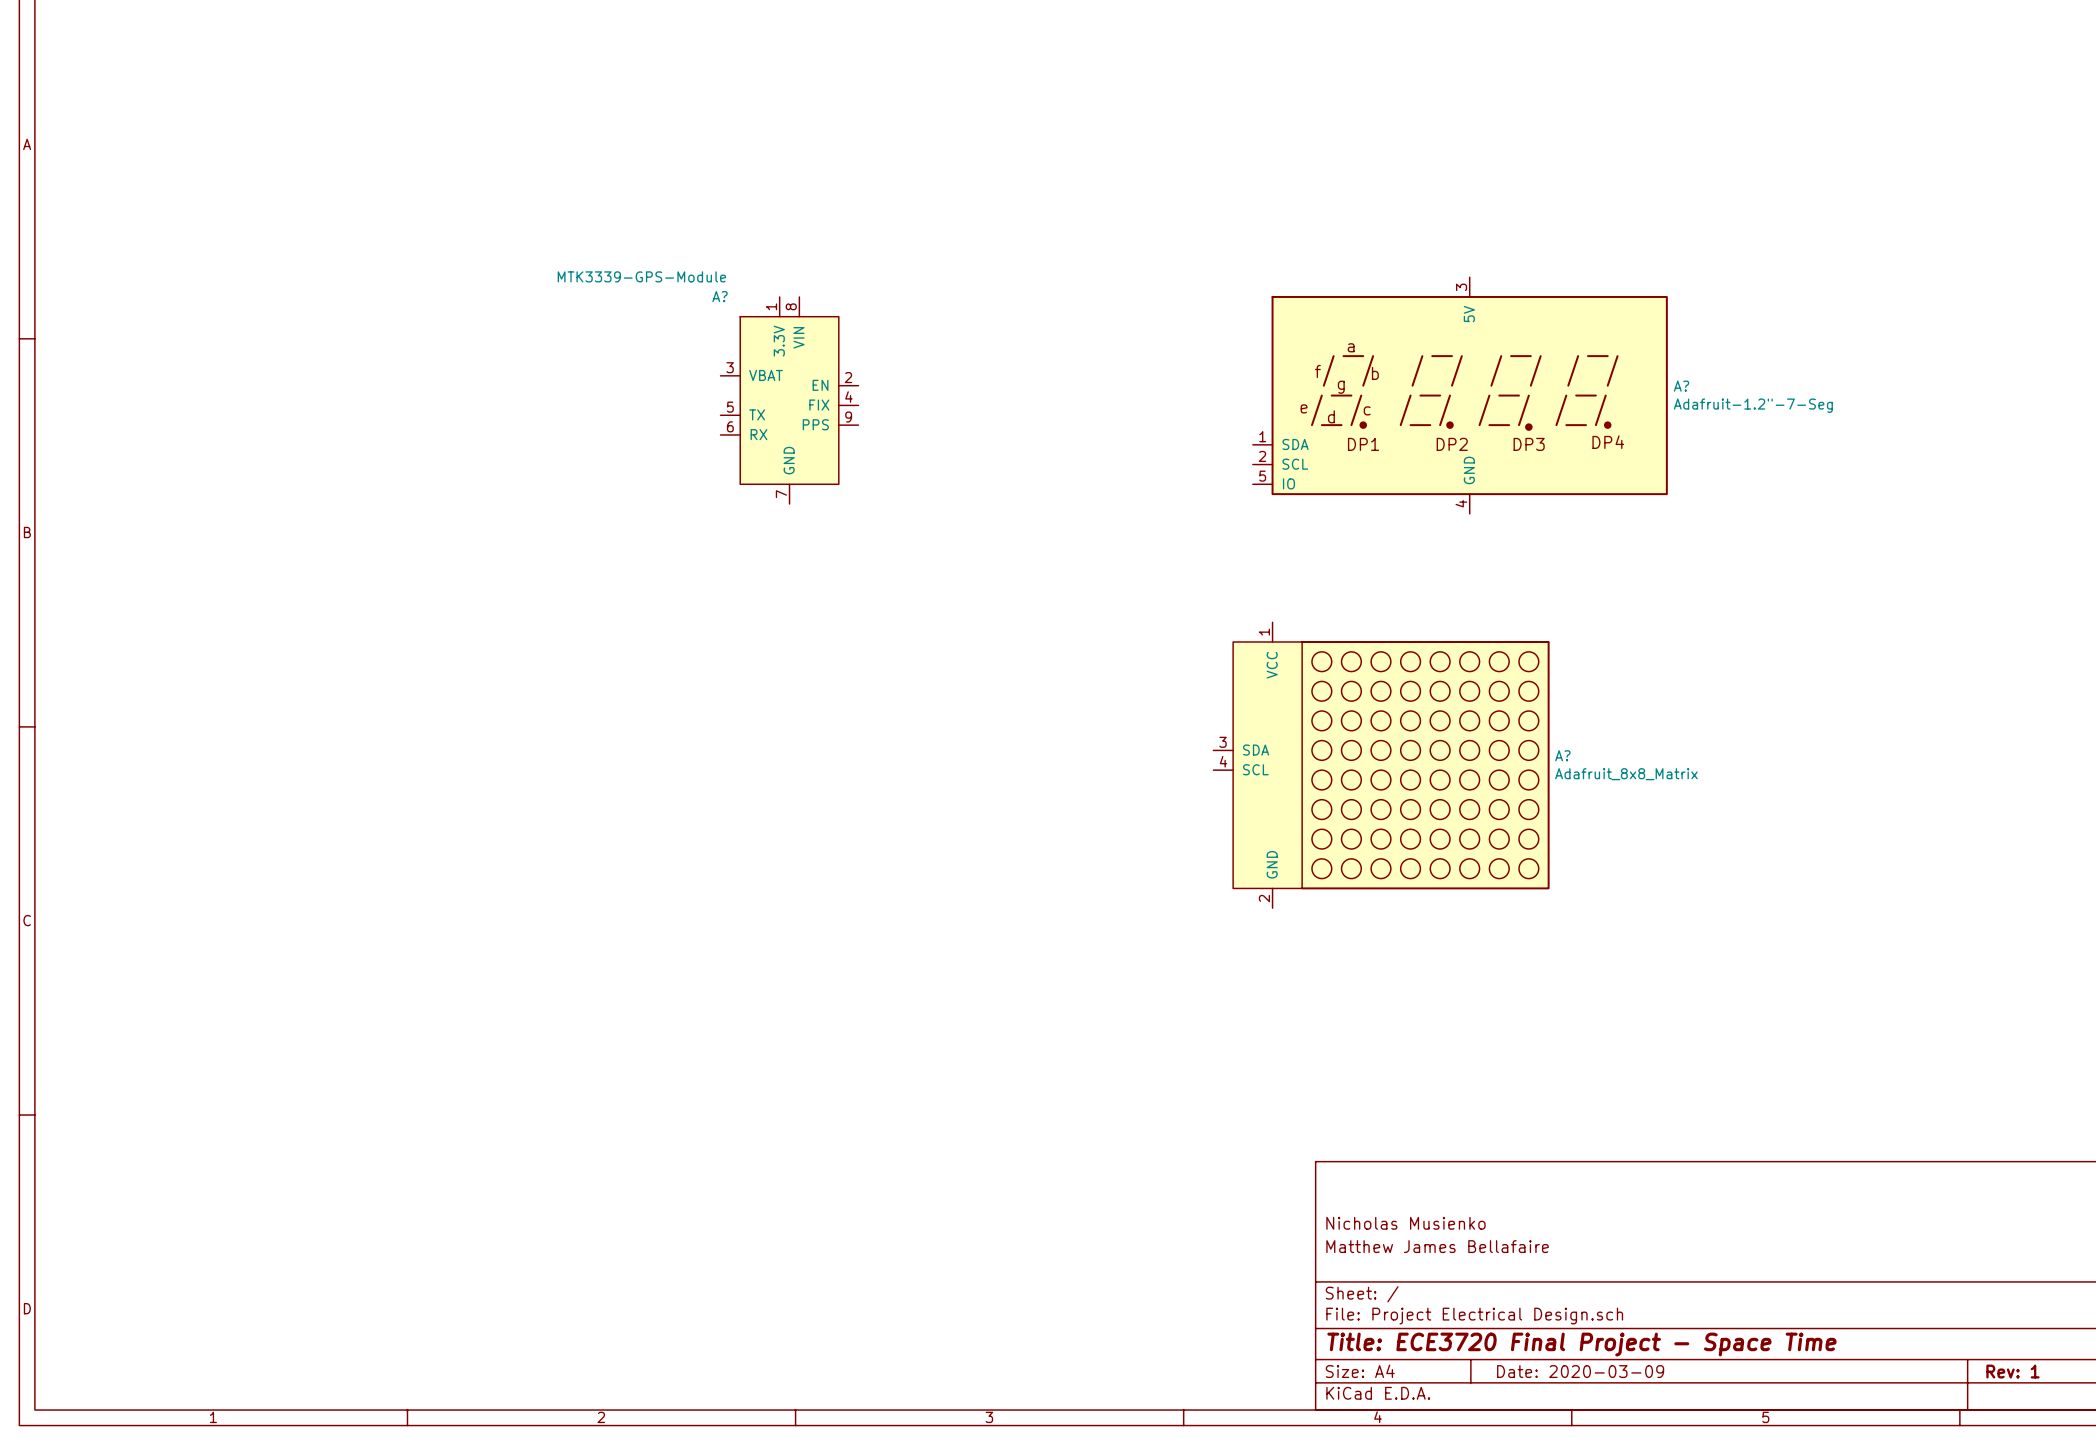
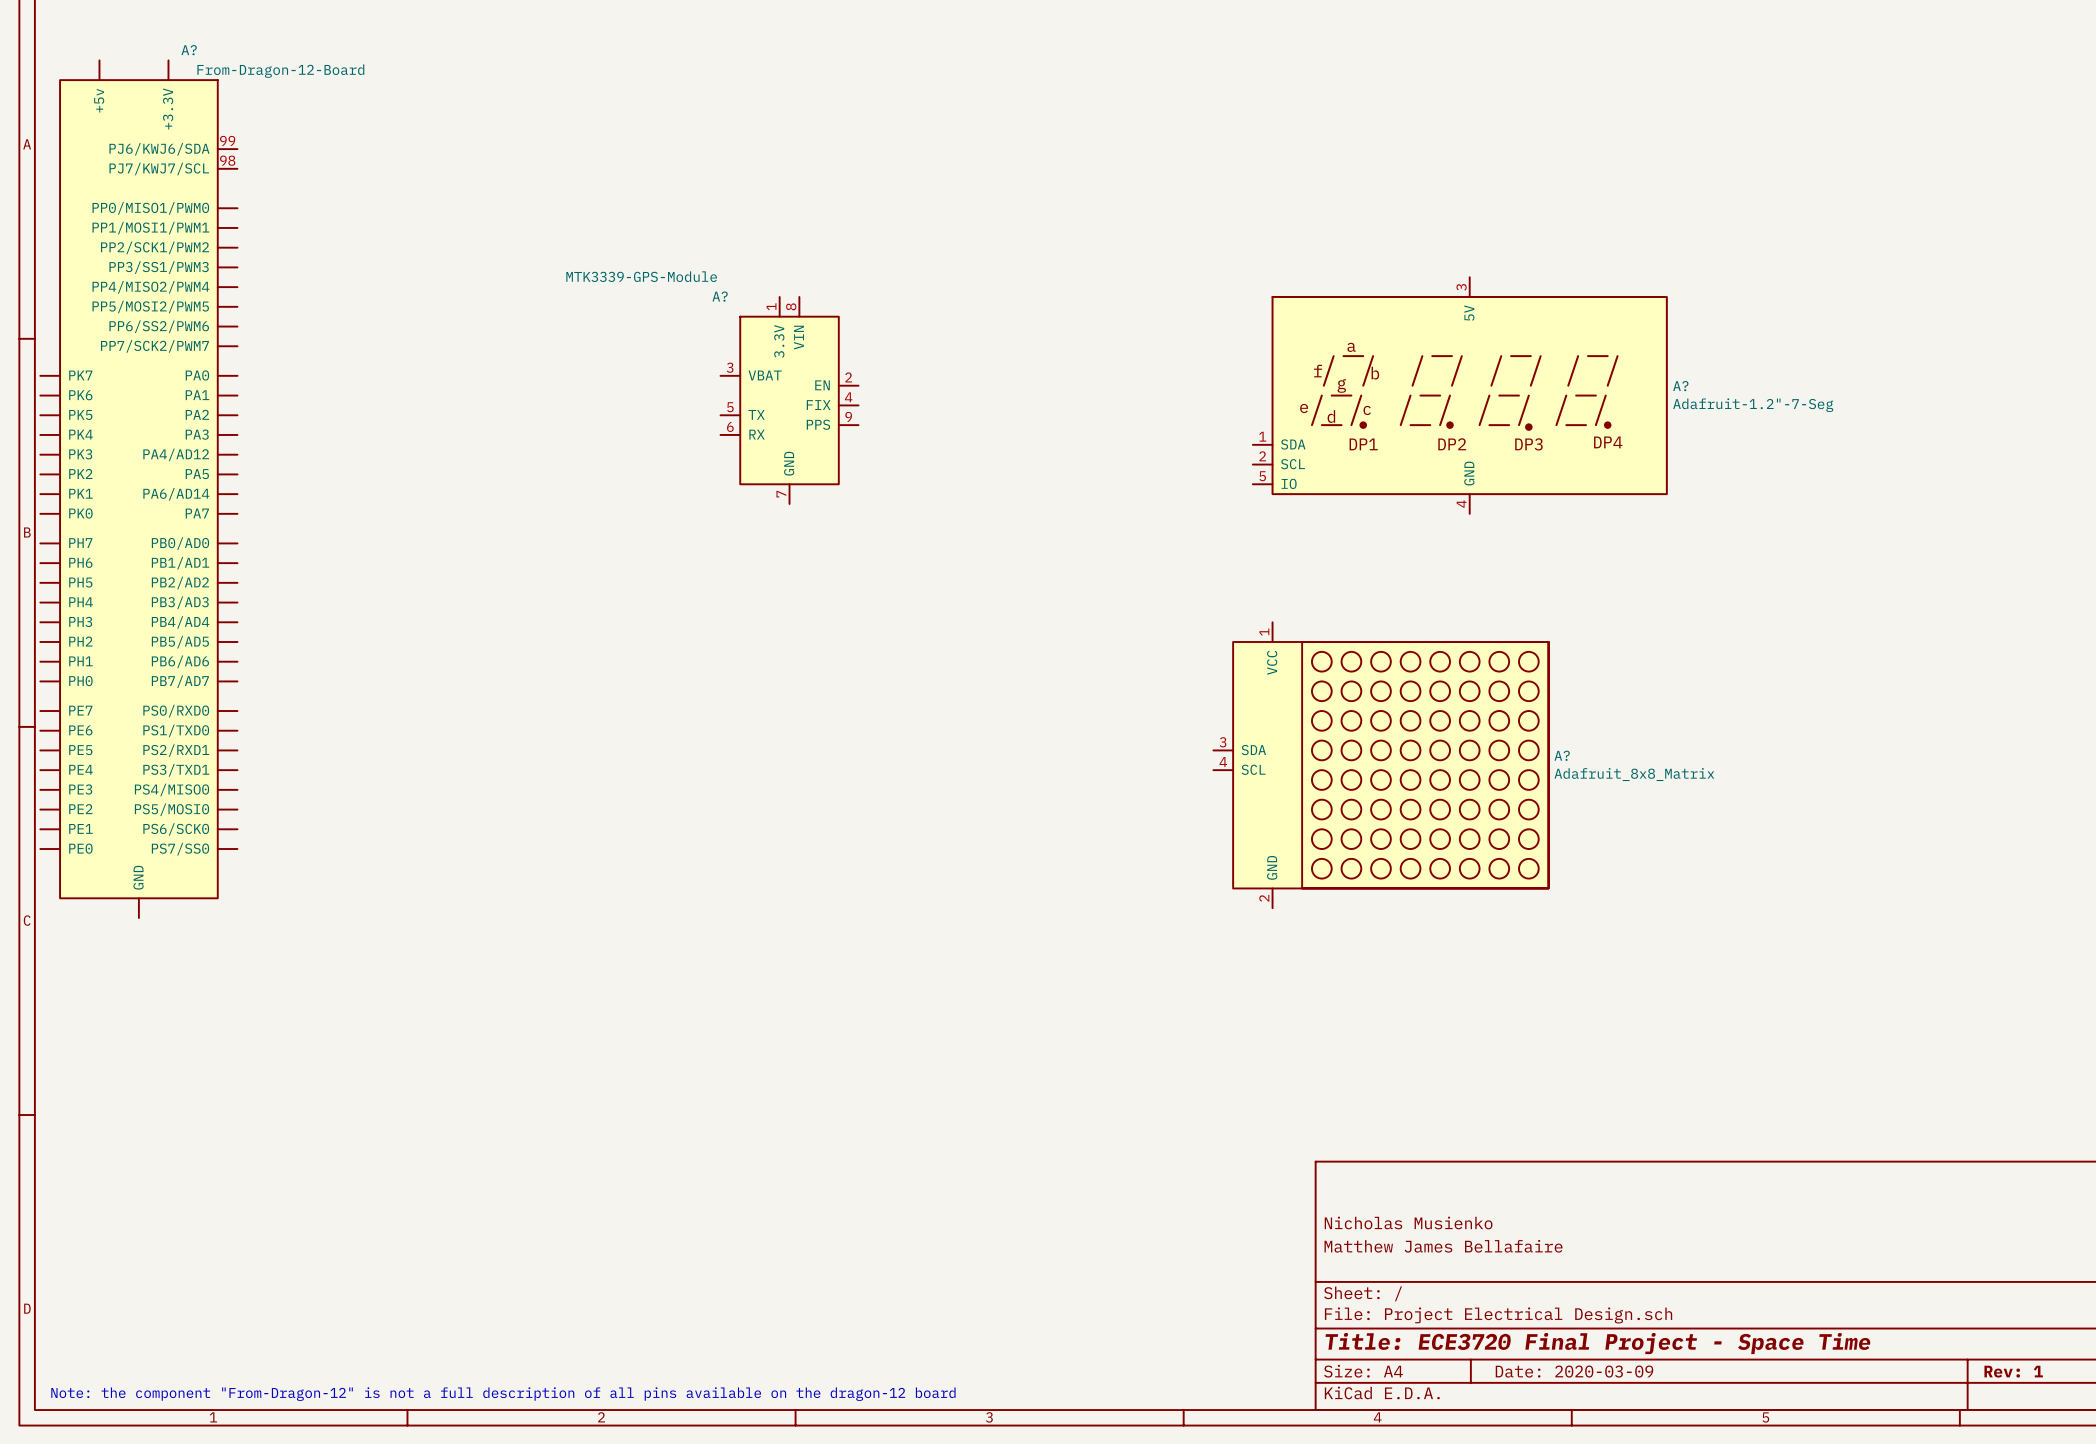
A?: none -> From-Dragon-12-Board (138, 489)
text: none -> Note: the component "From-Dragon-12" is not a full description of all pins available on the dragon-12 board (503, 1394)

